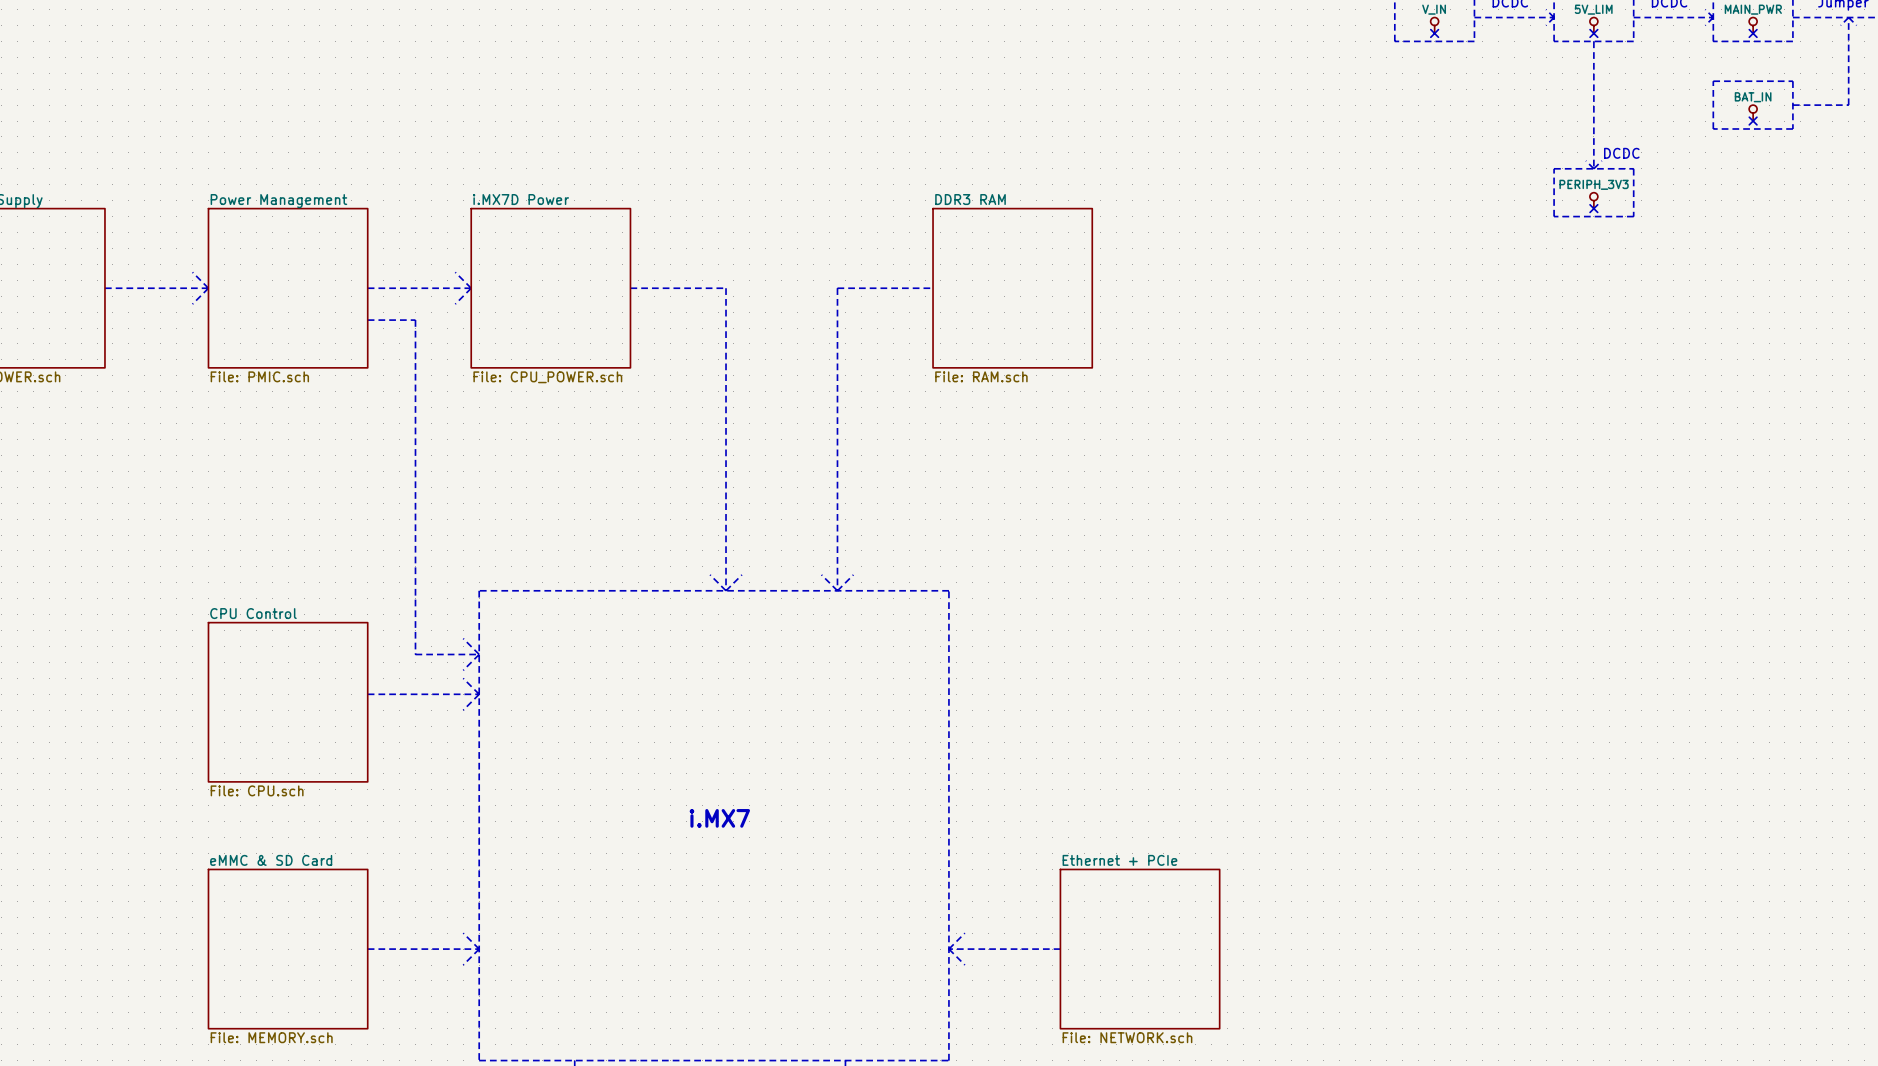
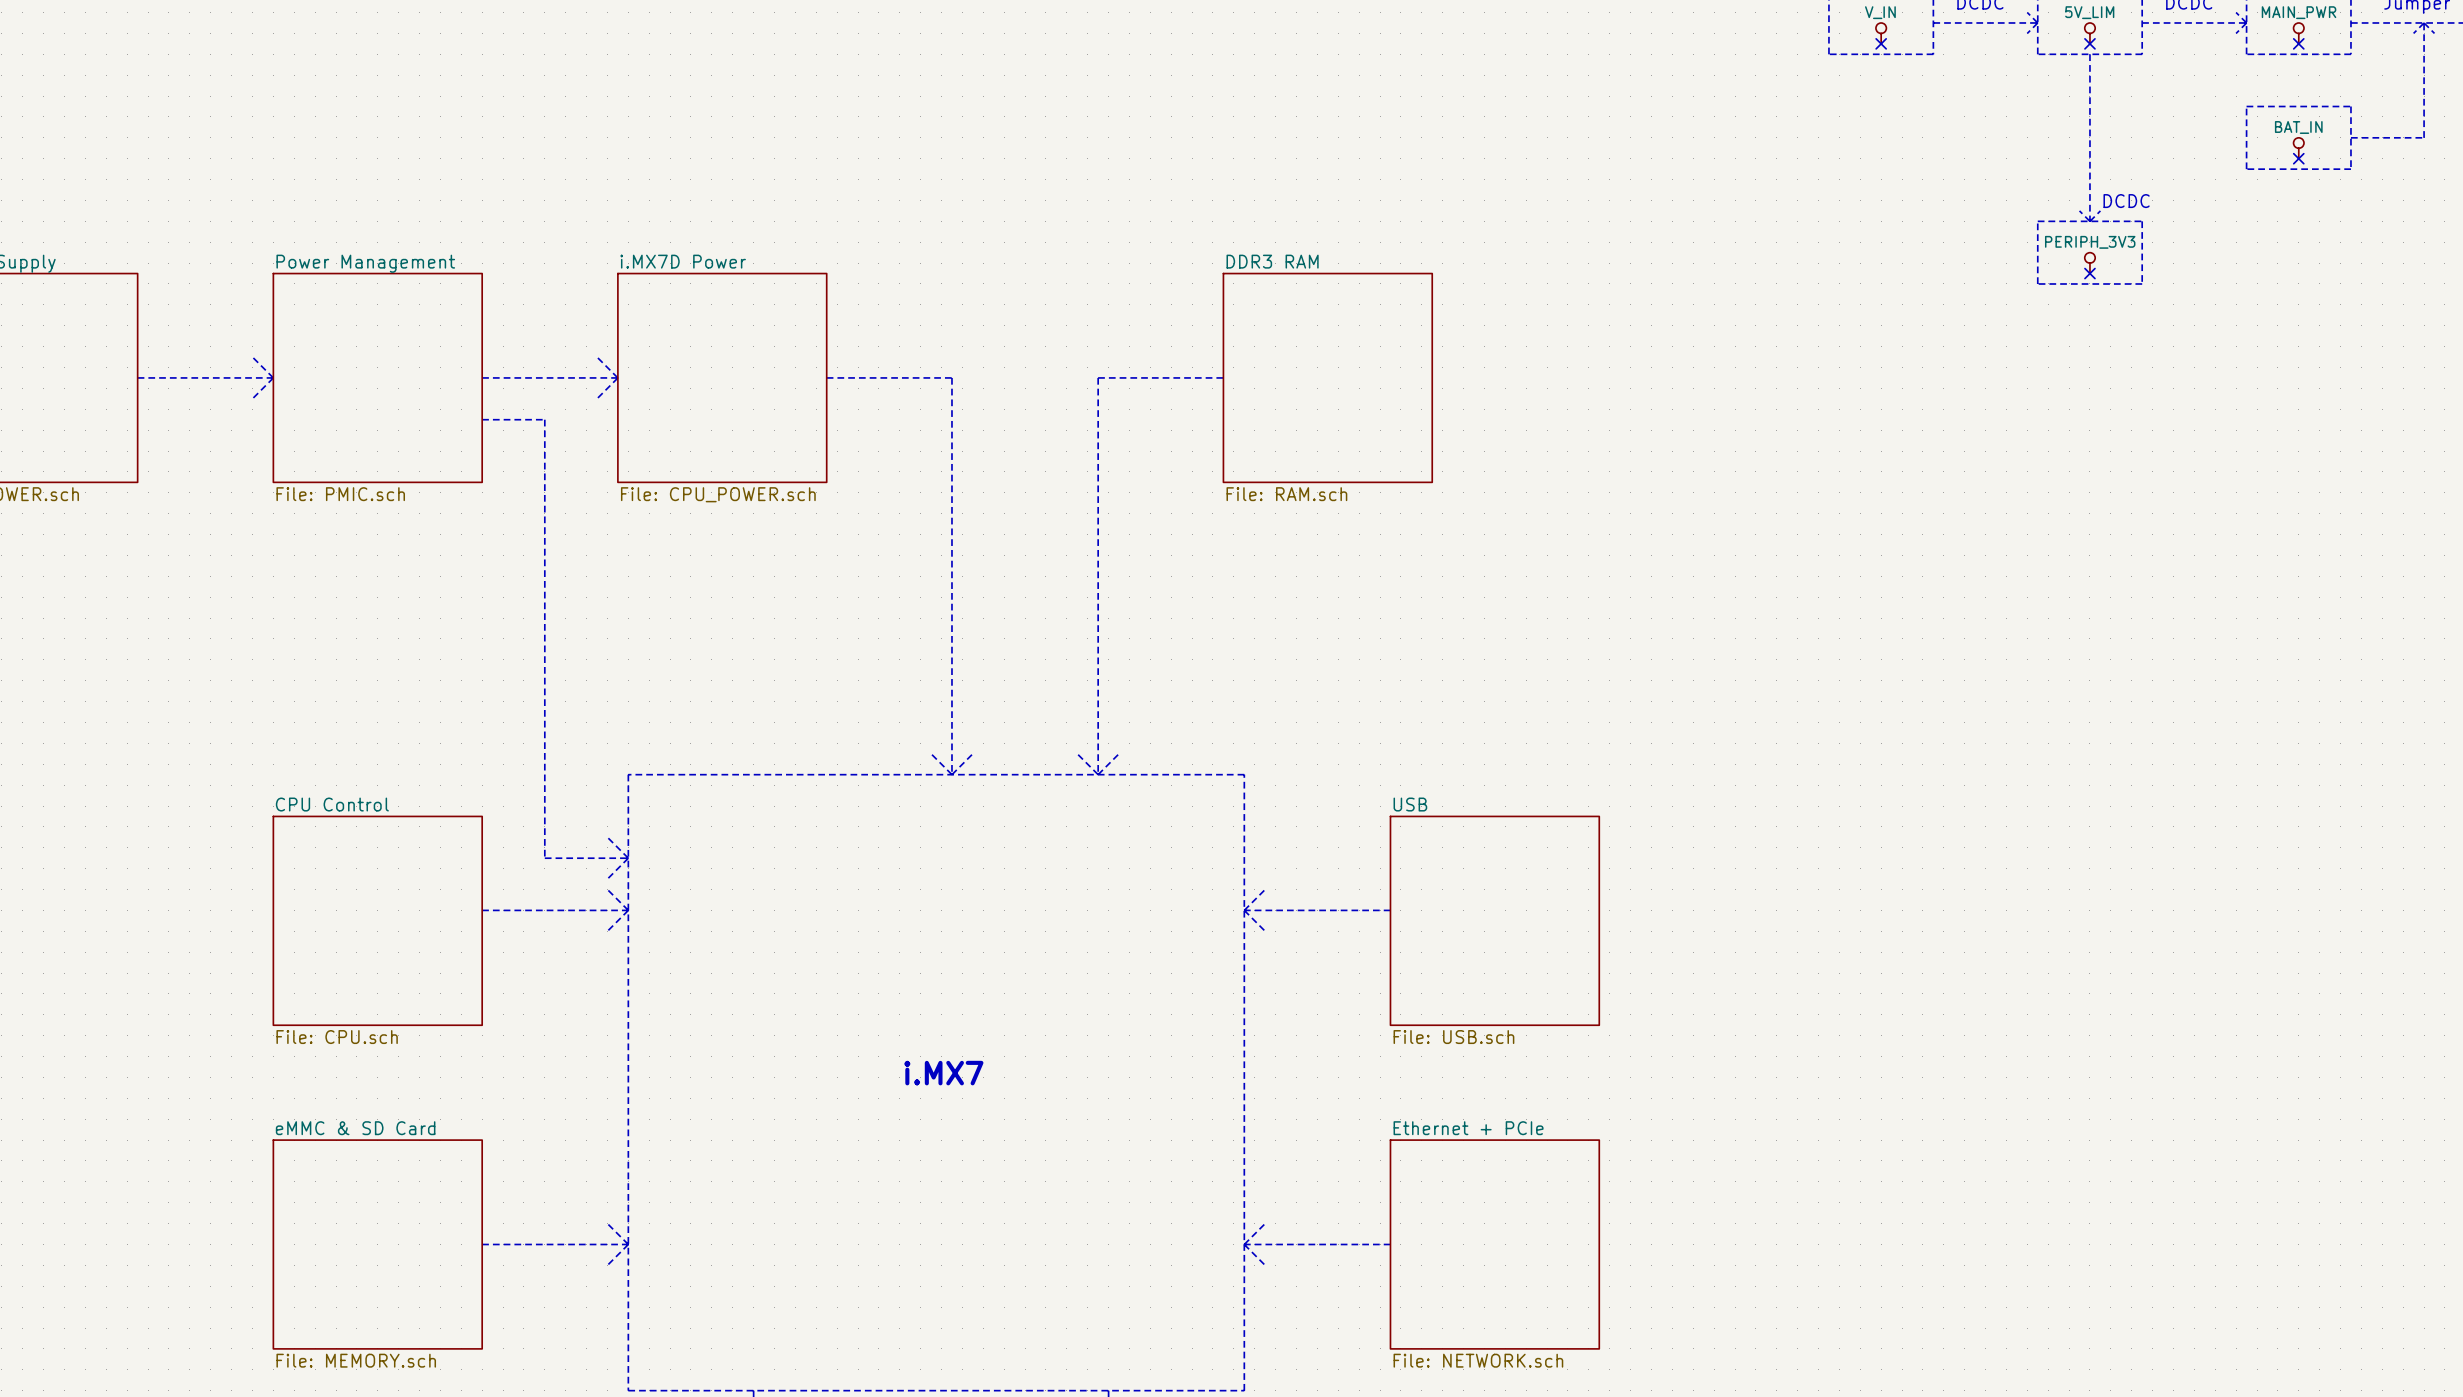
line: none -> (1265, 889) (1244, 910)
line: none -> (1244, 910) (1390, 910)
line: none -> (1244, 910) (1265, 931)
sheet USB: none -> File: USB.sch (1494, 920)

